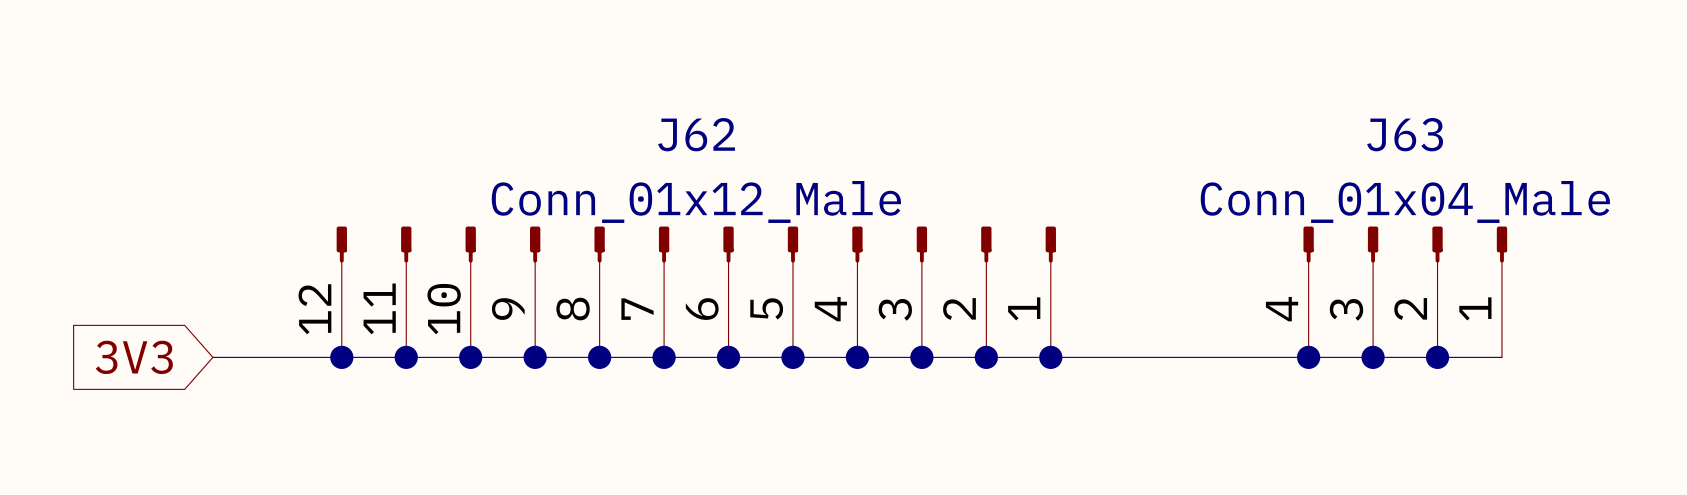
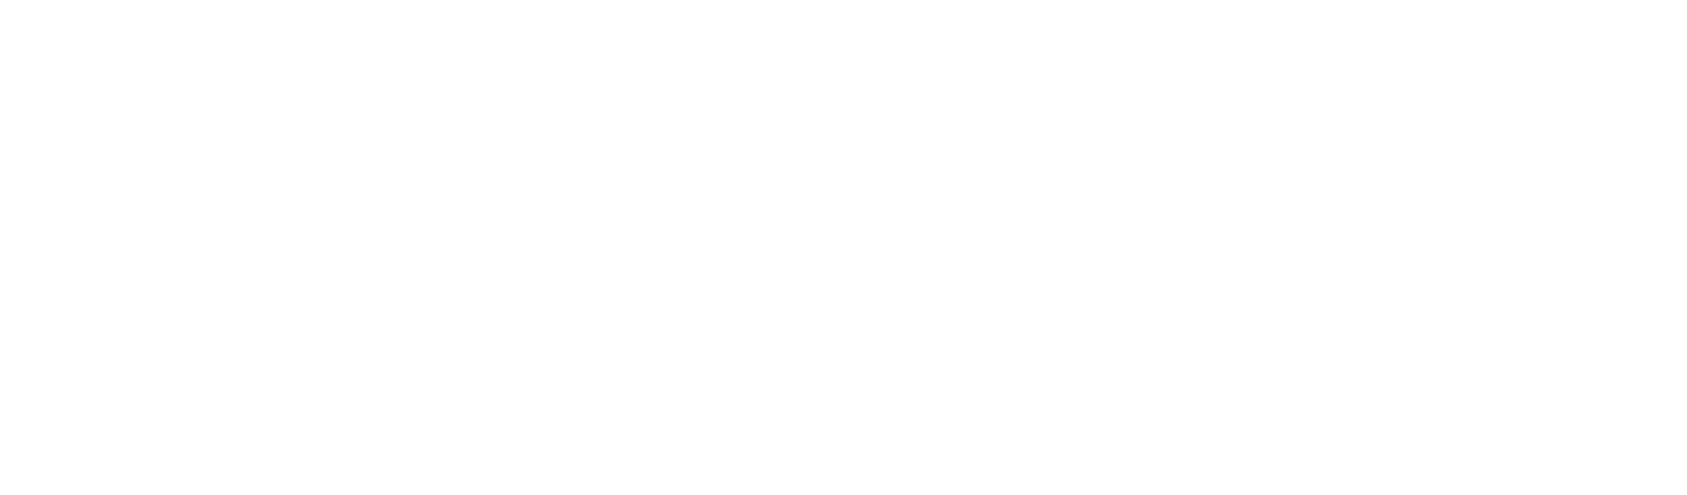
J62: Conn_01x12_Male (696, 291) -> none
J63: Conn_01x04_Male (1405, 291) -> none
global label: 3V3 (134, 357) -> none
wire: (212, 357) (1501, 357) -> none
junction: (341, 357) -> none
junction: (406, 357) -> none
junction: (470, 357) -> none
junction: (535, 357) -> none
junction: (599, 357) -> none
junction: (664, 357) -> none
junction: (728, 357) -> none
junction: (792, 357) -> none
junction: (857, 357) -> none
junction: (921, 357) -> none
junction: (986, 357) -> none
junction: (1050, 357) -> none
junction: (1308, 357) -> none
junction: (1373, 357) -> none
junction: (1437, 357) -> none

